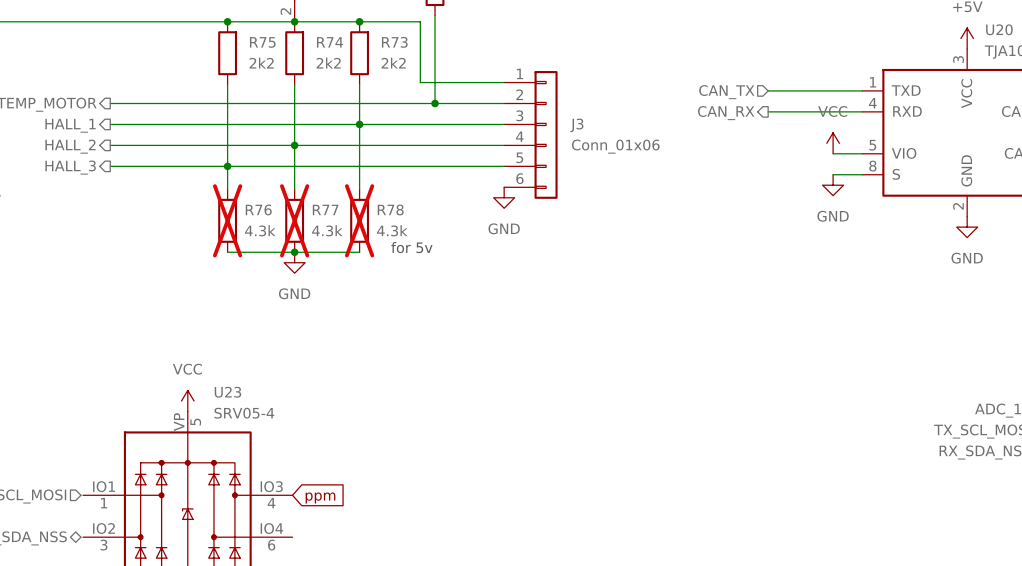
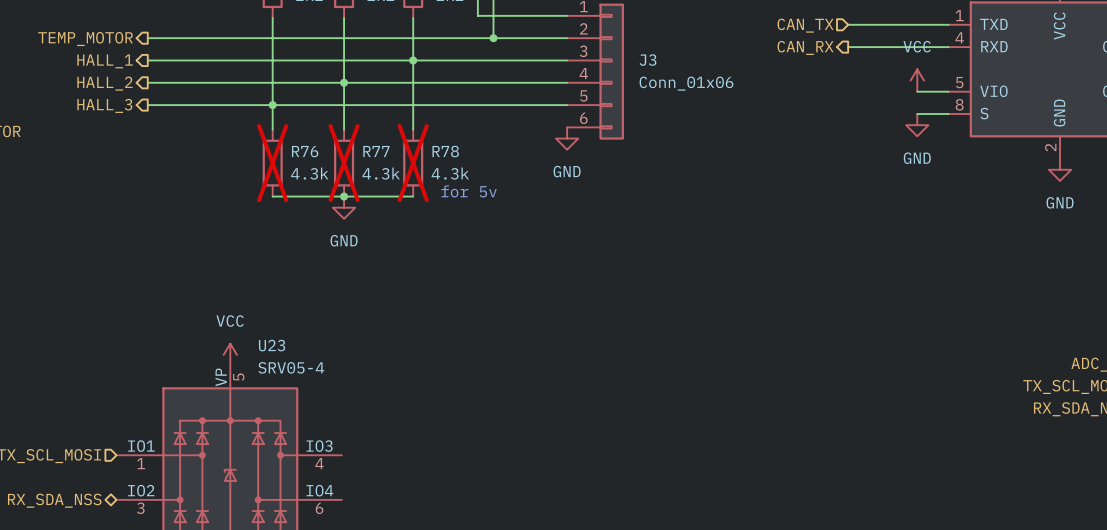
global label: ppm (320, 498) -> none

